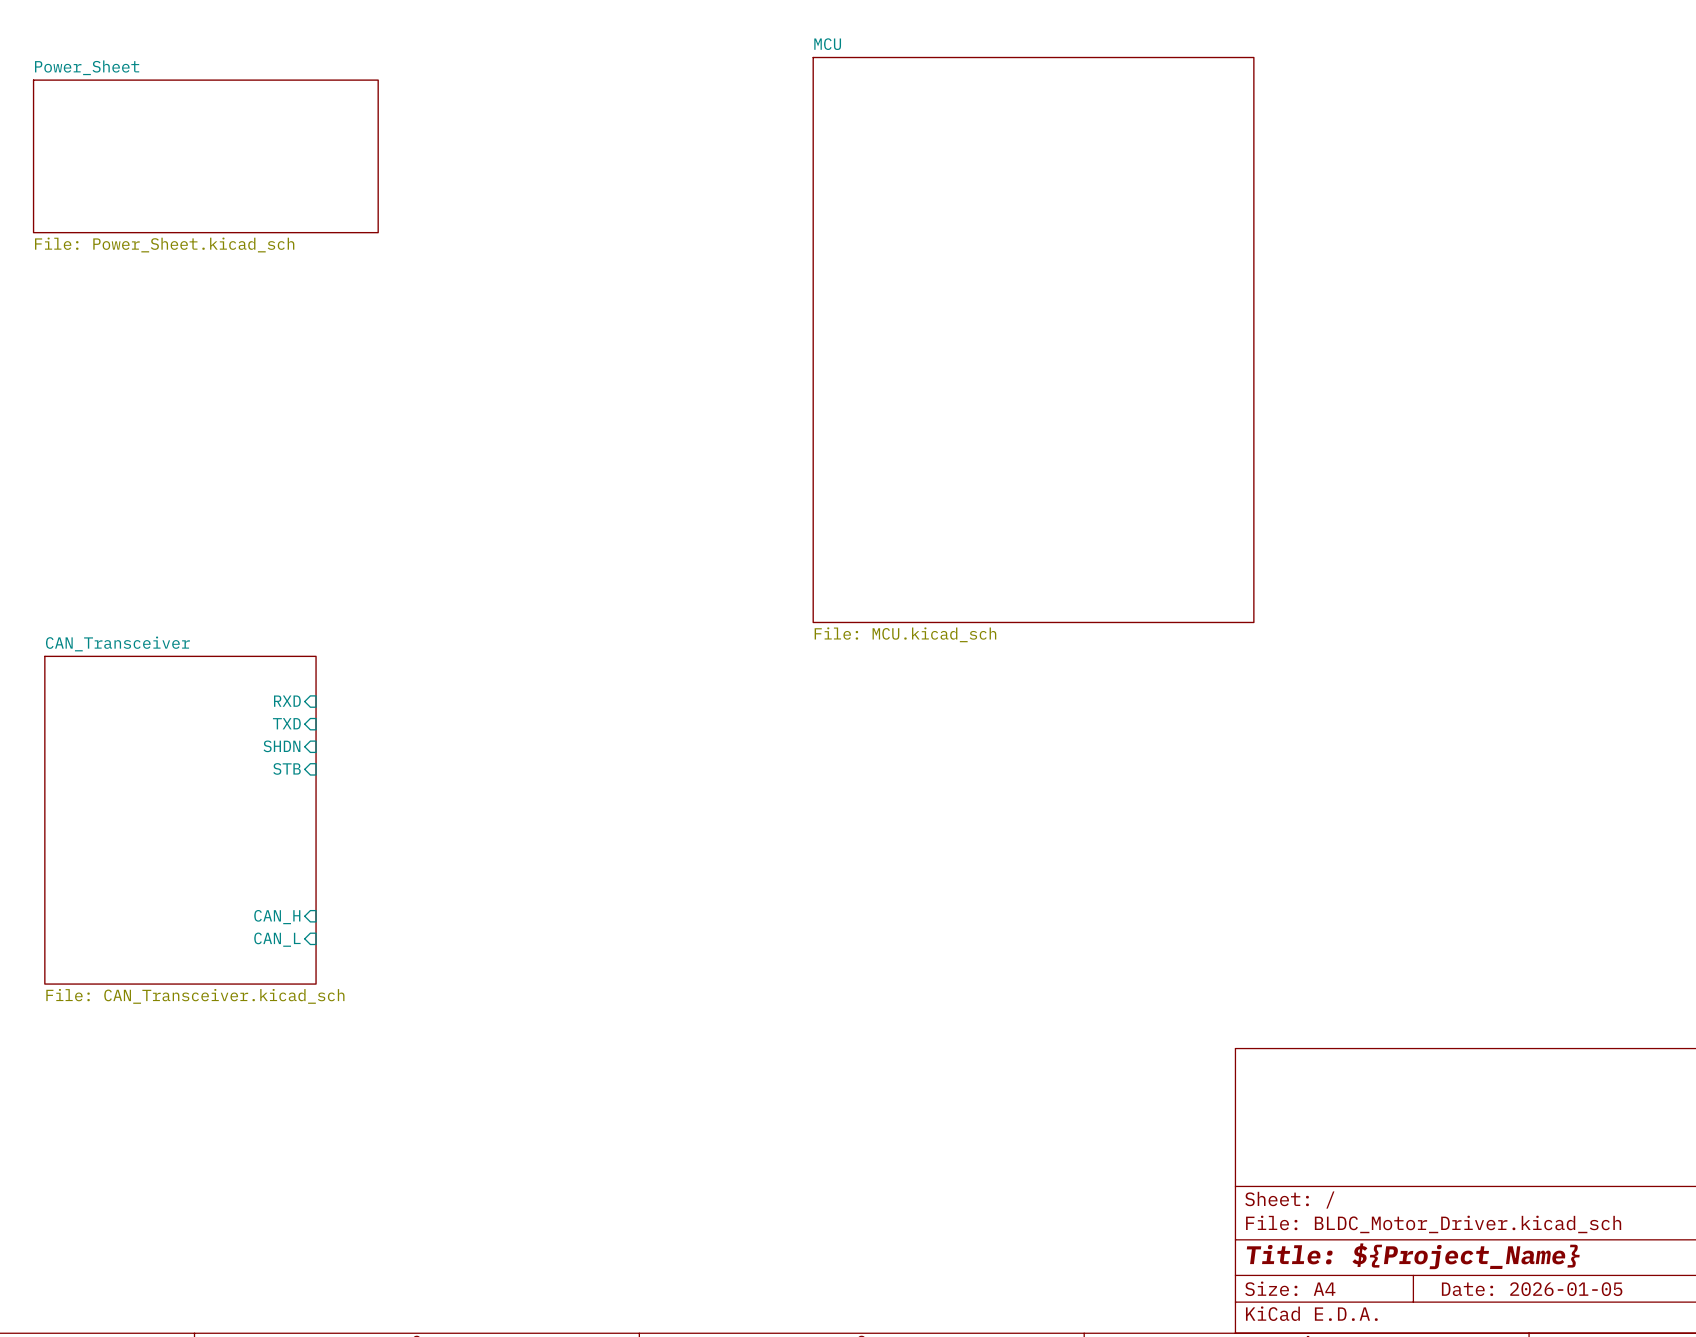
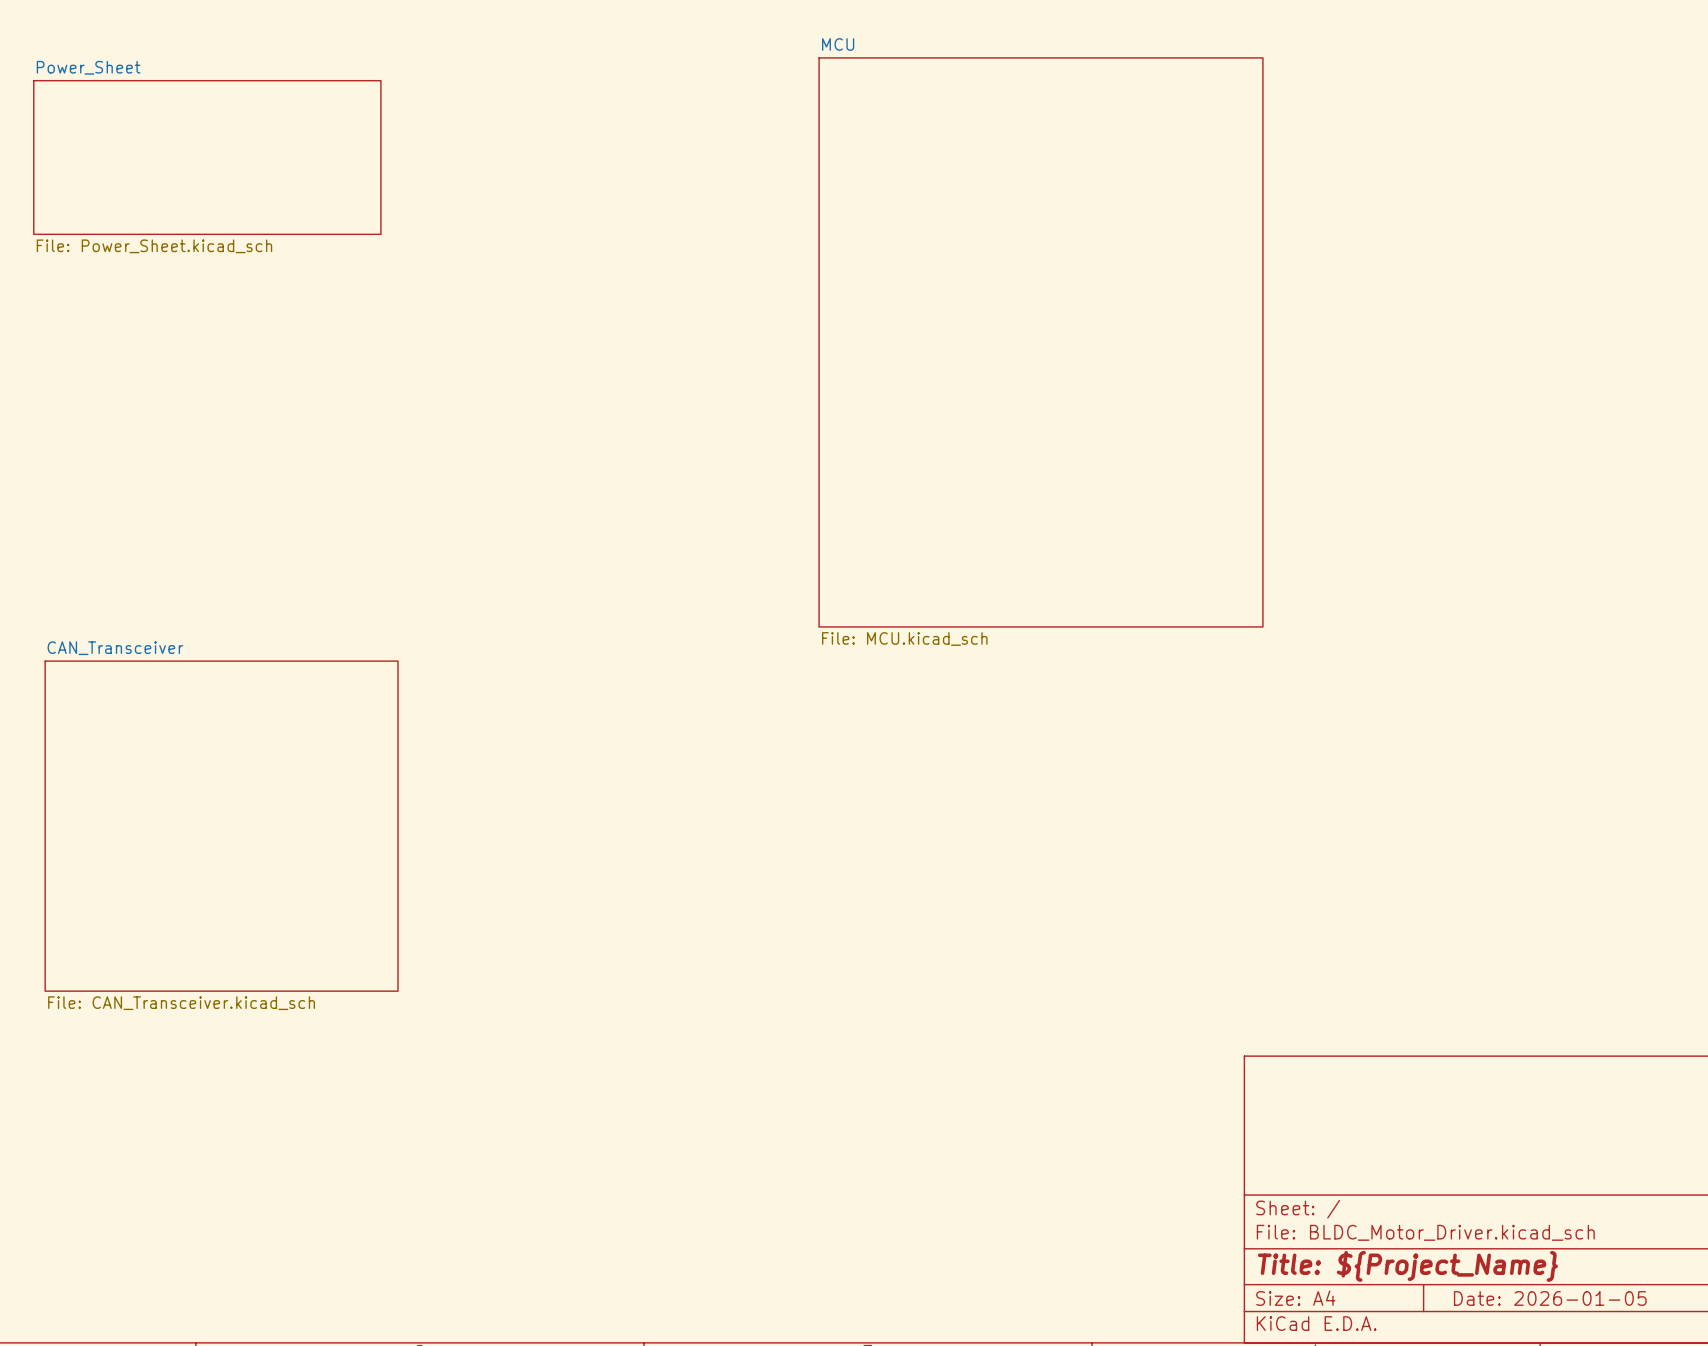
sheet pin: RXD (287, 701) -> none
sheet pin: TXD (286, 723) -> none
sheet pin: SHDN (281, 746) -> none
sheet pin: STB (287, 768) -> none
sheet CAN_Transceiver: File: CAN_Transceiver.kicad_sch (180, 820) -> none
sheet CAN_Transceiver: none -> File: CAN_Transceiver.kicad_sch (221, 826)
sheet pin: CAN_H (277, 917) -> none
sheet pin: CAN_L (277, 939) -> none

